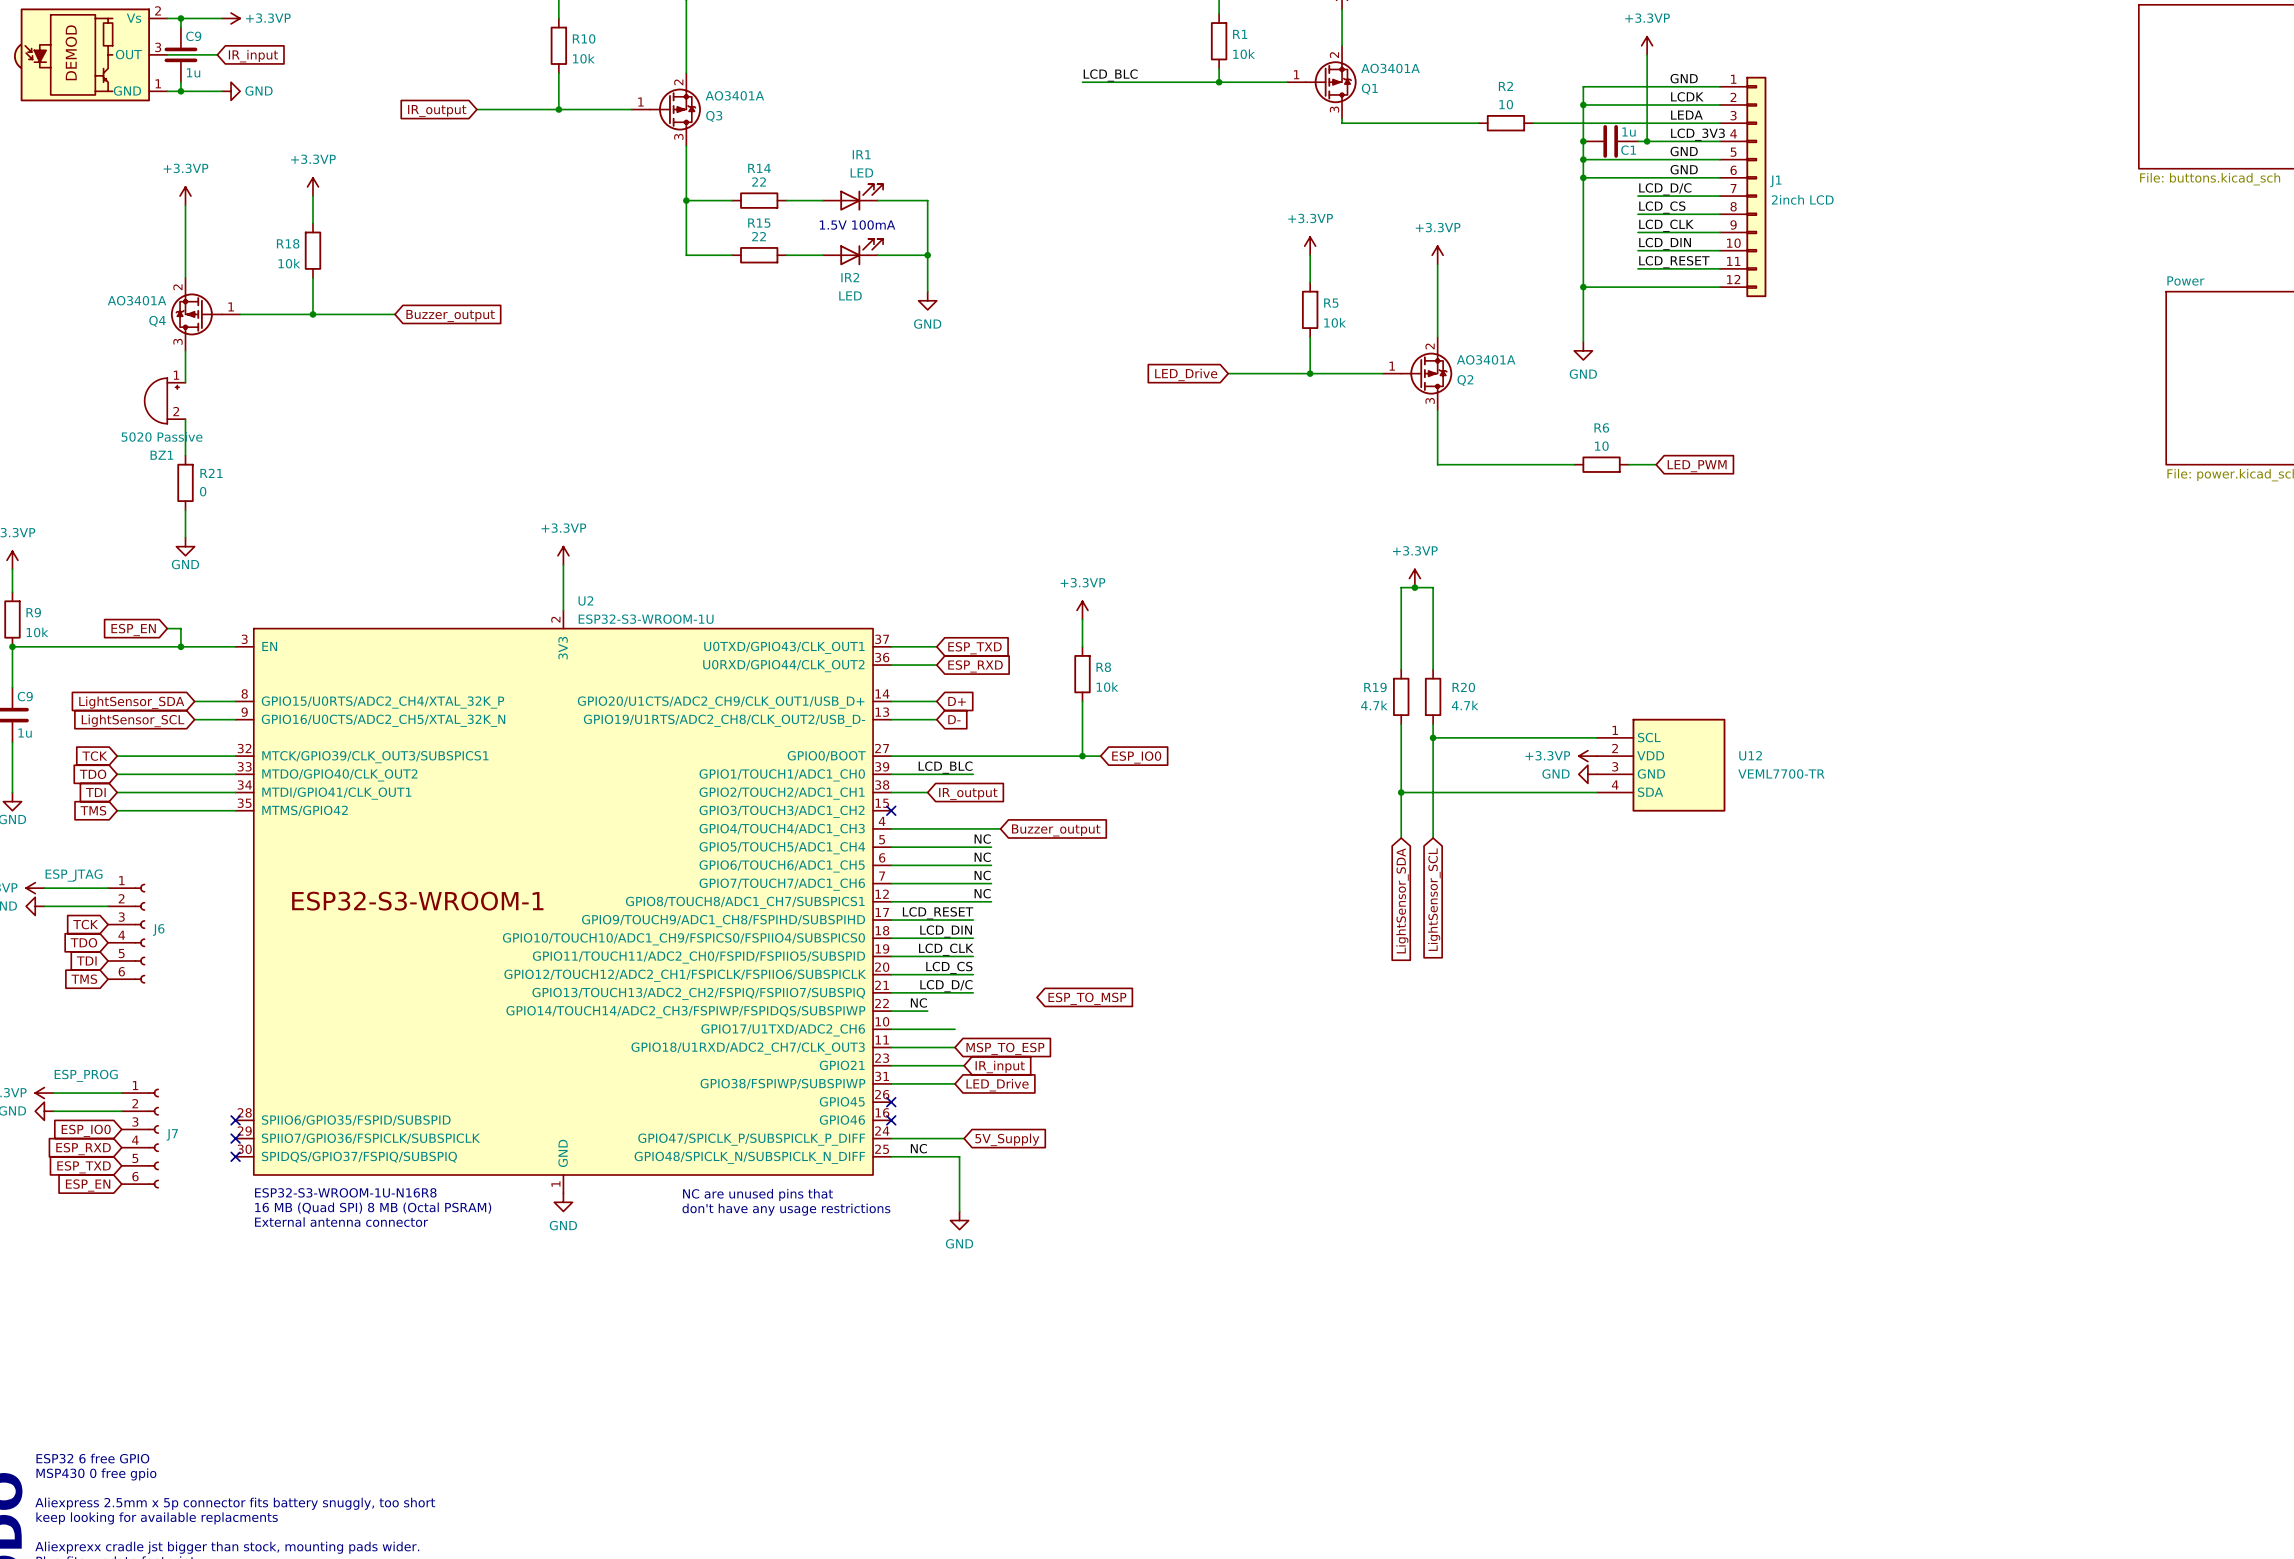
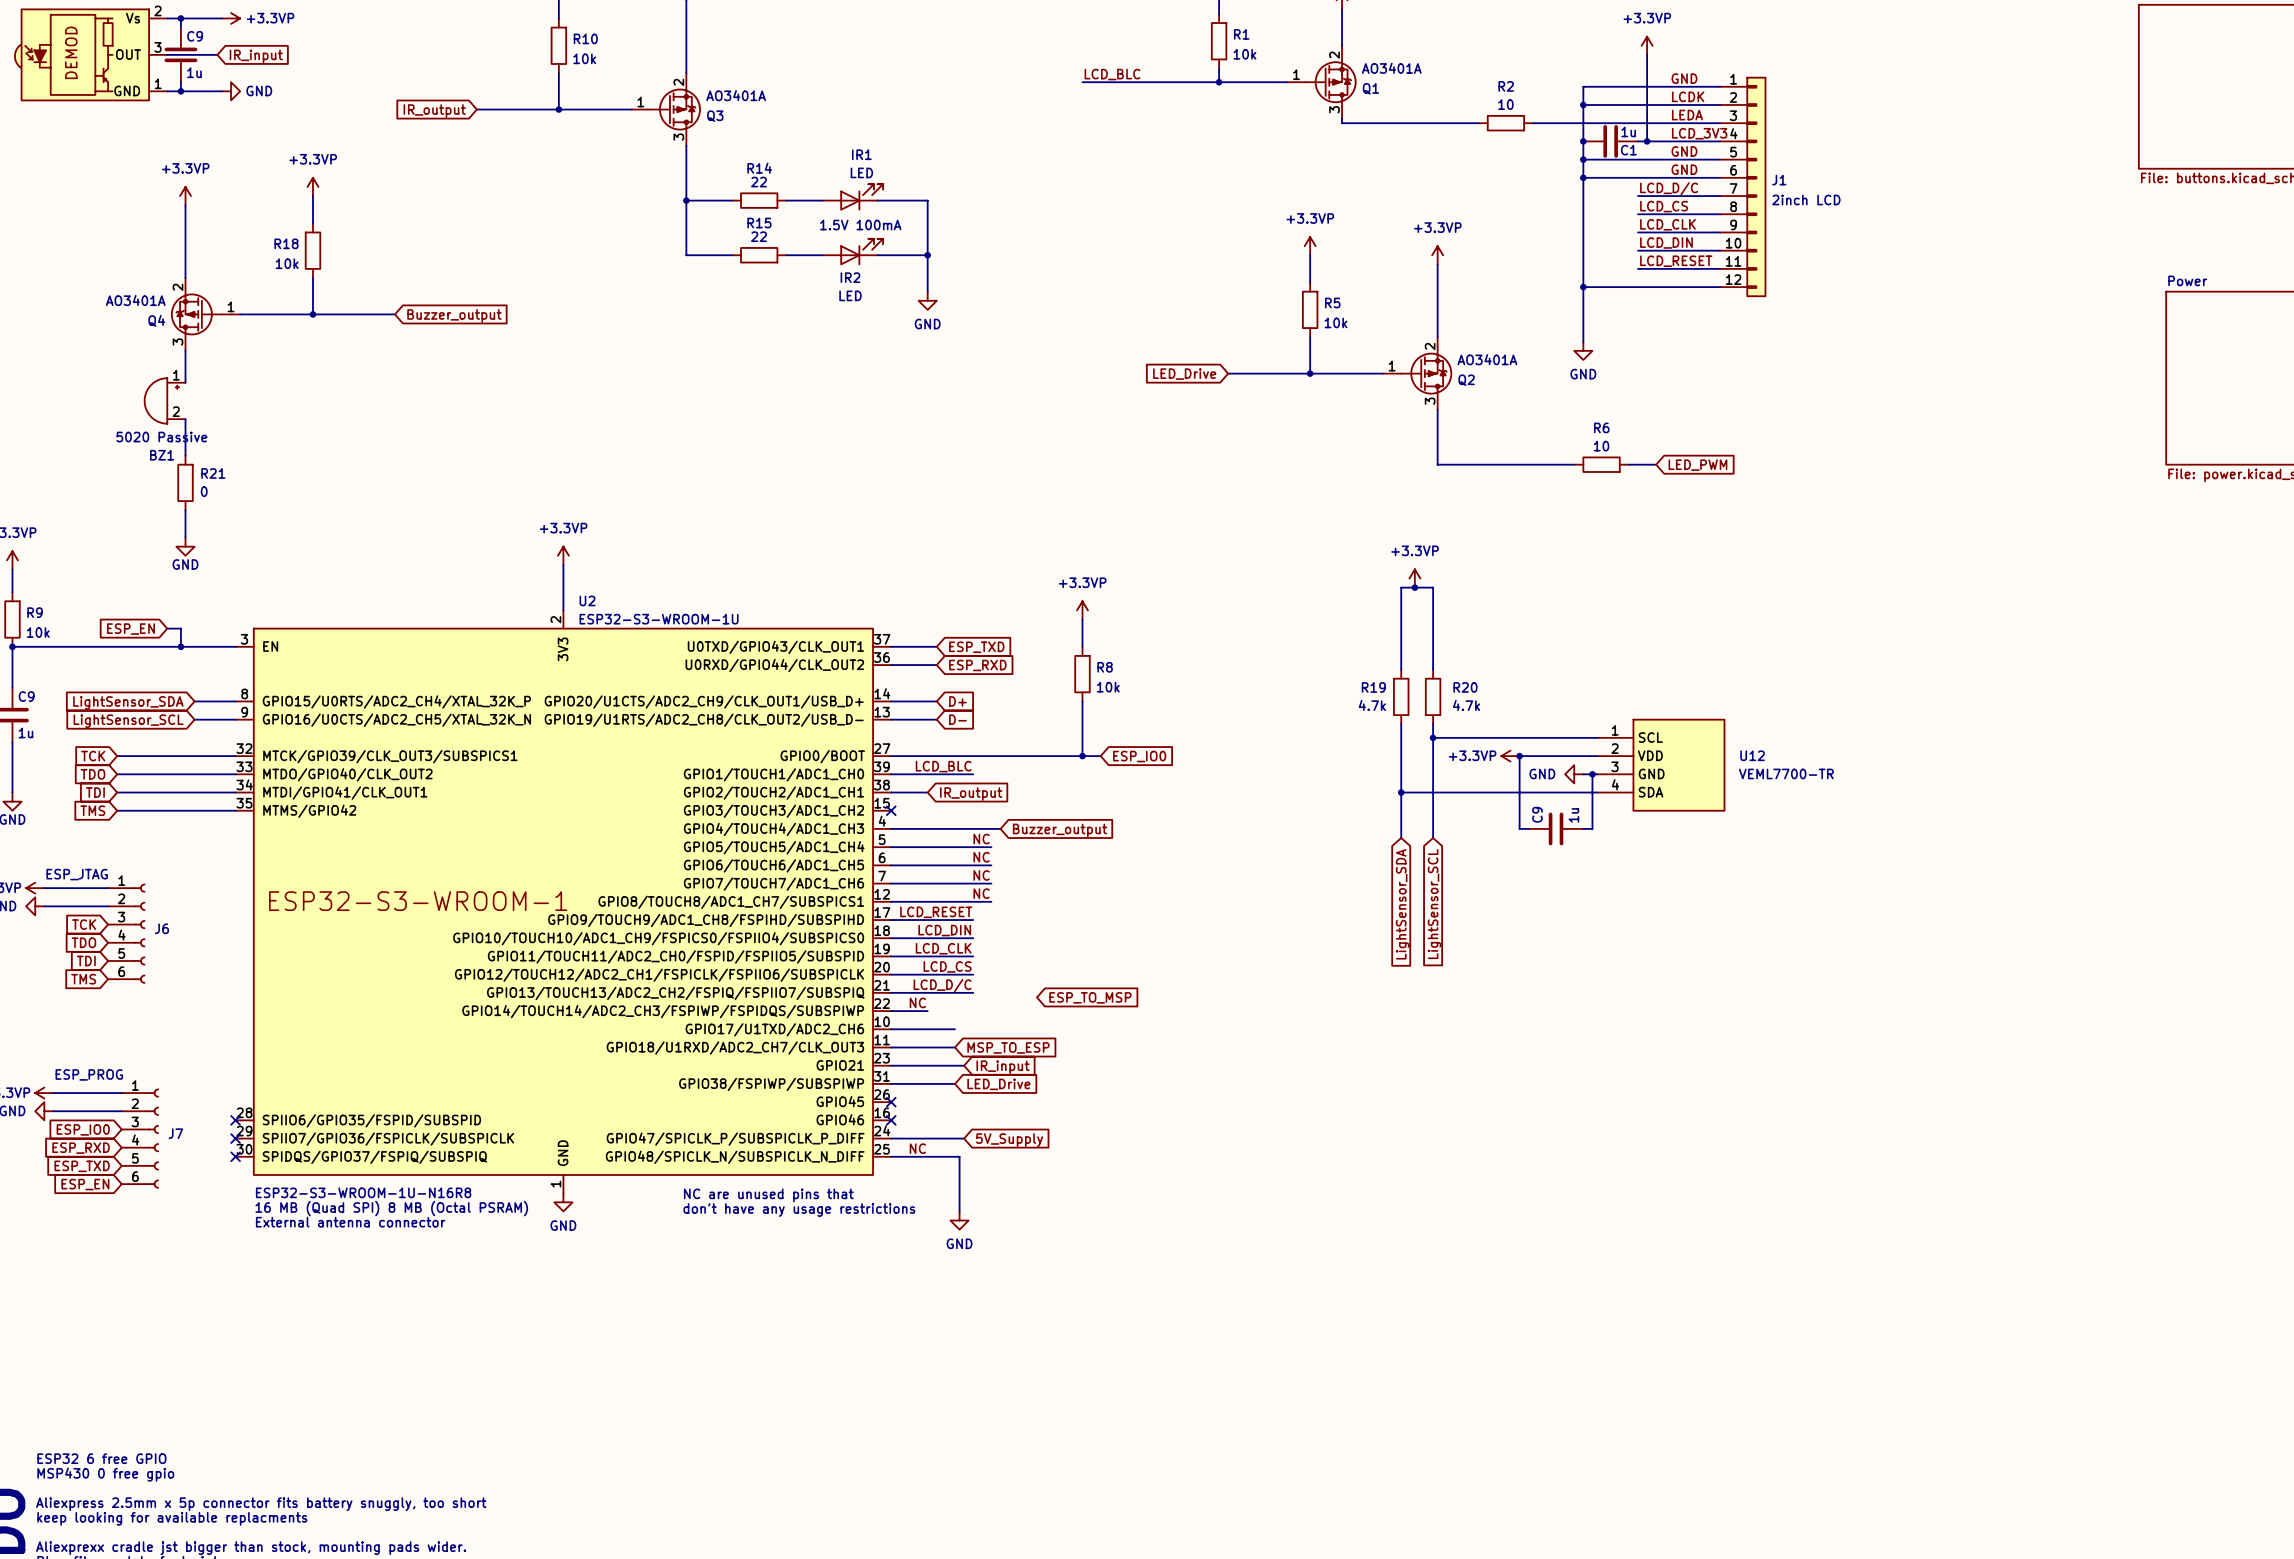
junction: none -> (1519, 756)
power symbol position: +3.3VP (1587, 756) -> +3.3VP (1510, 756)
wire: none -> (1597, 756) (1519, 756) (1519, 828) (1528, 828)
power symbol position: GND (1587, 774) -> GND (1574, 774)
wire: none -> (1592, 774) (1592, 828) (1583, 828)
junction: none -> (1592, 774)
C9: none -> 1u (1556, 828)

